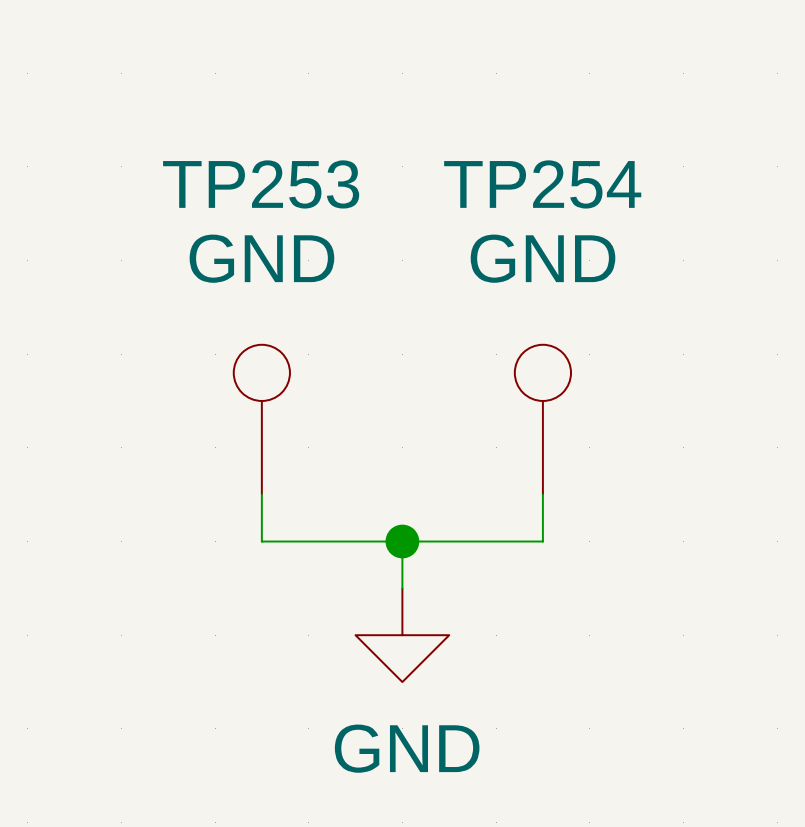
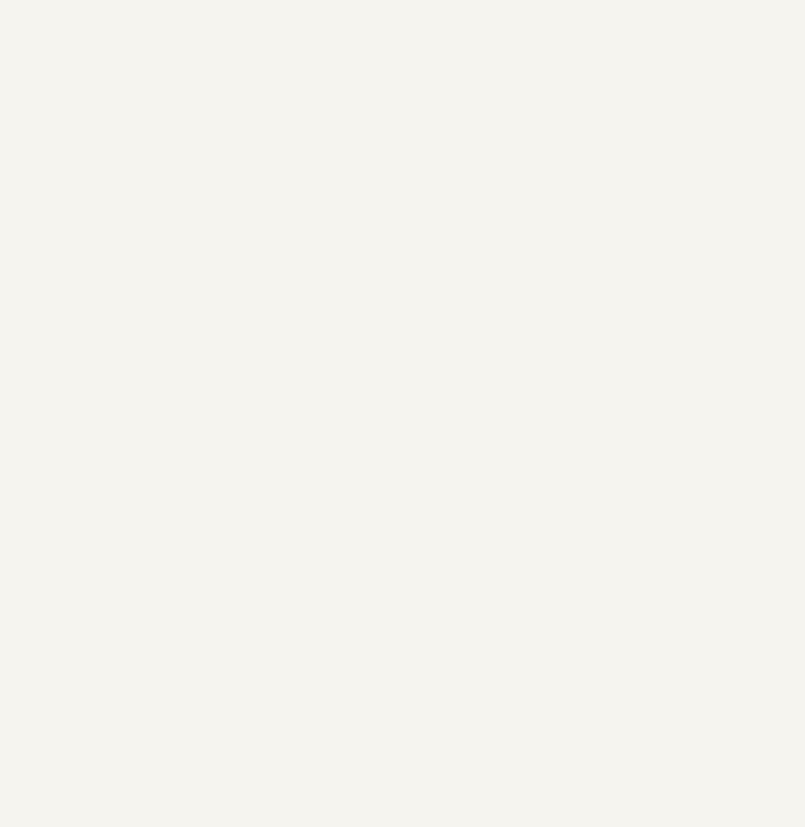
TP253: GND (261, 419) -> none
TP254: GND (542, 419) -> none
wire: (261, 494) (261, 541) (542, 541) (542, 494) -> none
wire: (402, 541) (402, 588) -> none
junction: (402, 541) -> none
power symbol: GND (402, 635) -> none

